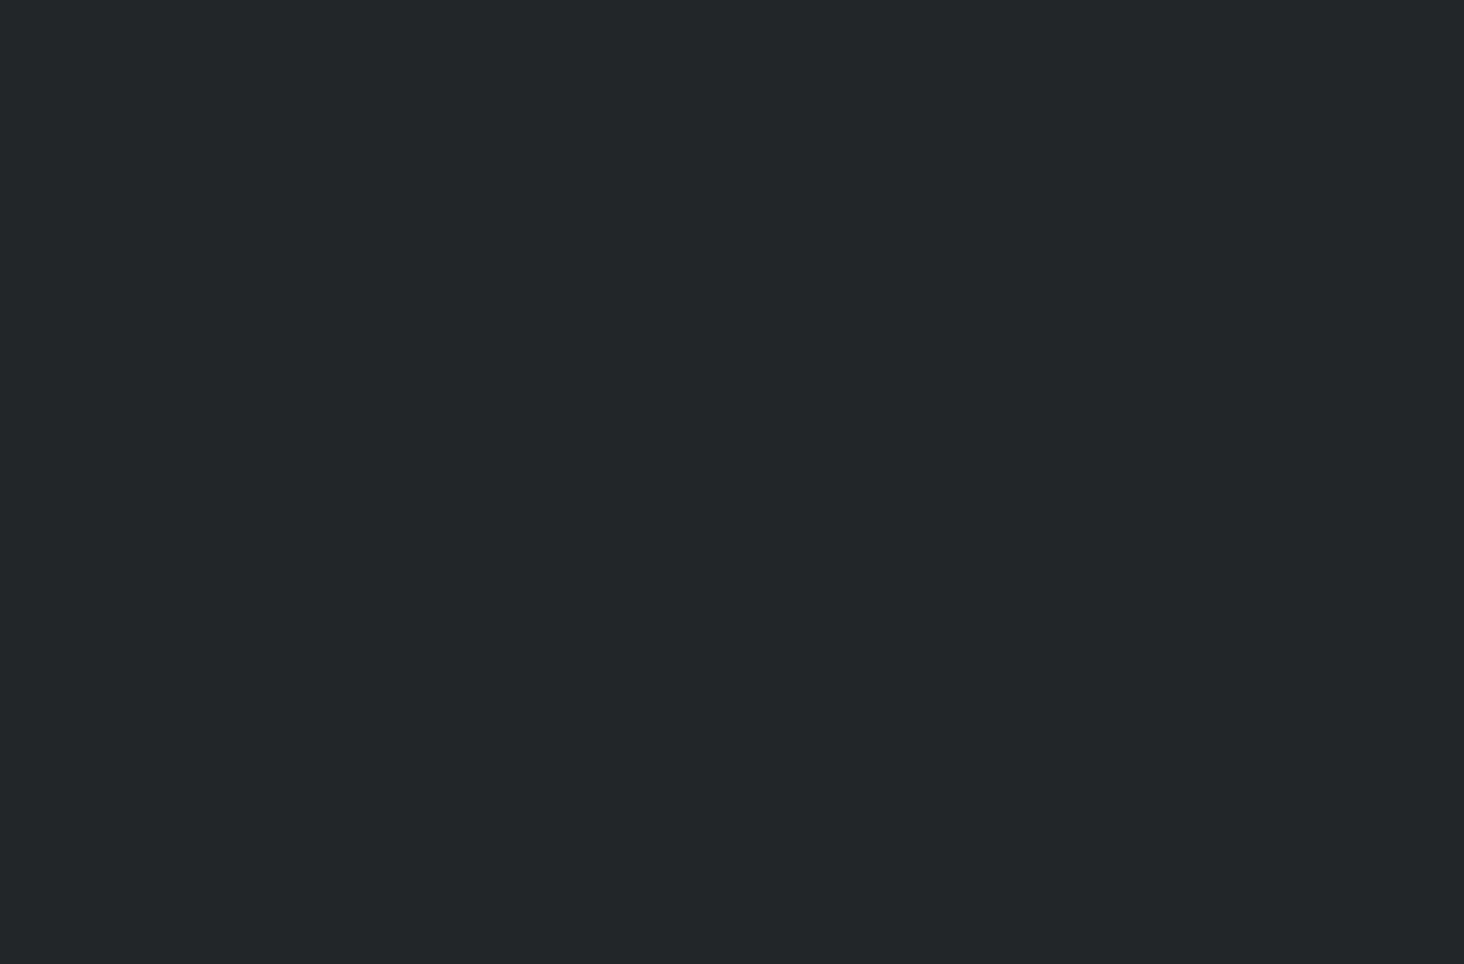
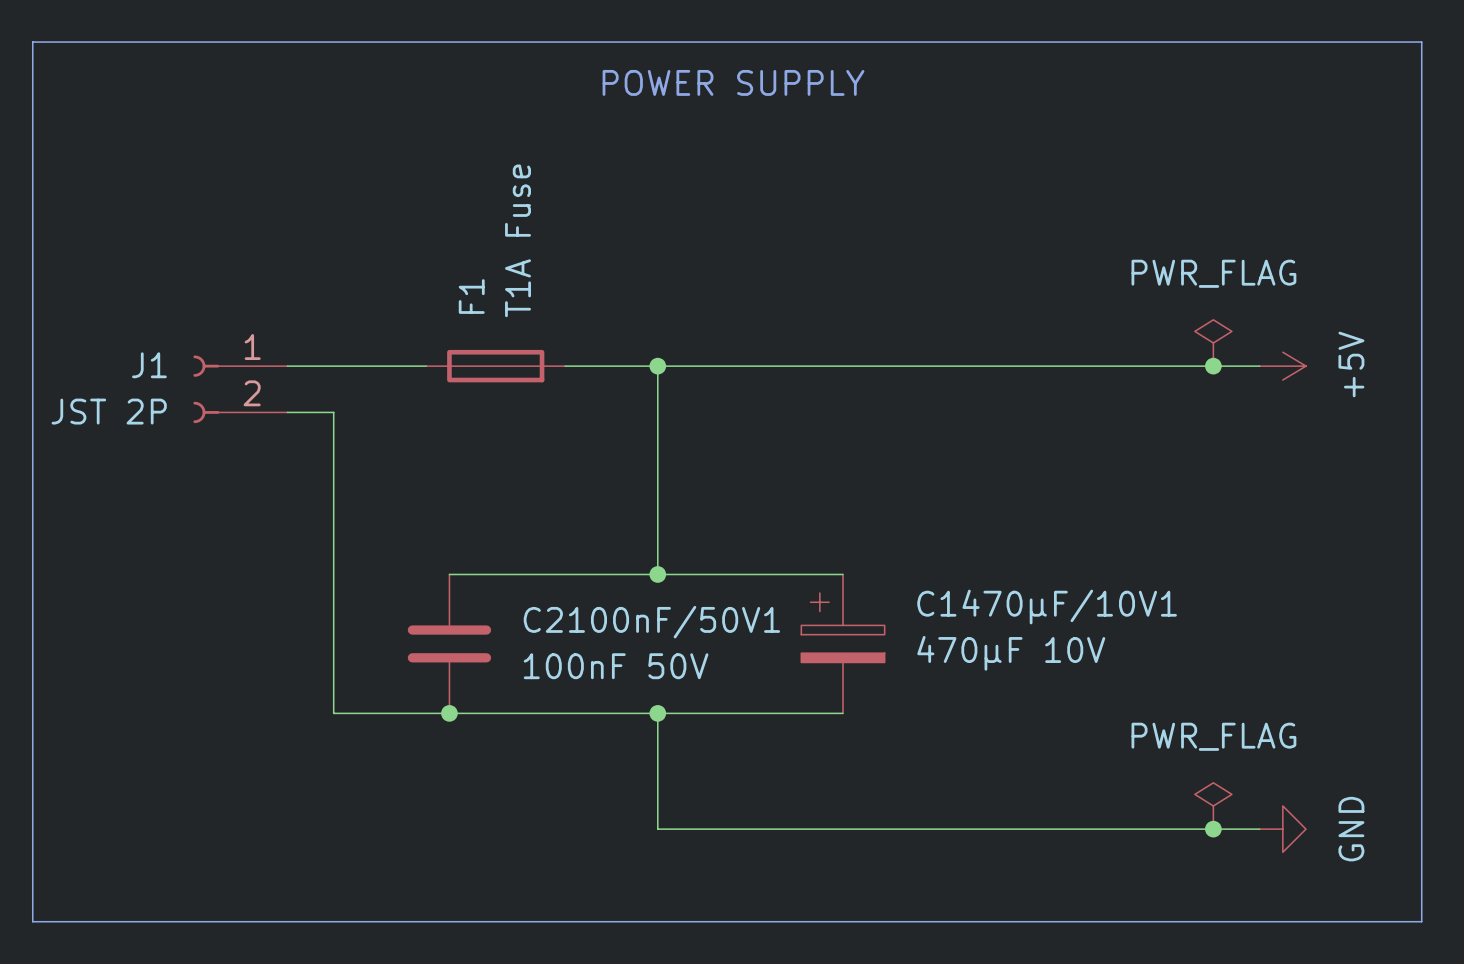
line: none -> (32, 42) (1421, 42) (1421, 921) (32, 921) (32, 42)
text: none -> POWER SUPPLY (733, 82)
power symbol: none -> PWR_FLAG (1213, 342)
wire: none -> (287, 366) (426, 366)
F1: none -> T1A Fuse (495, 366)
wire: none -> (565, 366) (1259, 366)
wire: none -> (657, 366) (657, 574)
junction: none -> (657, 366)
junction: none -> (1213, 366)
power symbol: none -> +5V (1282, 366)
J1: none -> JST 2P (240, 389)
wire: none -> (287, 412) (333, 412) (333, 713) (842, 713)
wire: none -> (449, 574) (842, 574)
junction: none -> (657, 574)
C2100nF/50V1: none -> 100nF 50V (449, 643)
C1470µF/10V1: none -> 470µF 10V (842, 643)
junction: none -> (449, 713)
wire: none -> (657, 713) (657, 829) (1259, 829)
junction: none -> (657, 713)
power symbol: none -> PWR_FLAG (1213, 805)
junction: none -> (1213, 829)
power symbol: none -> GND (1282, 829)

